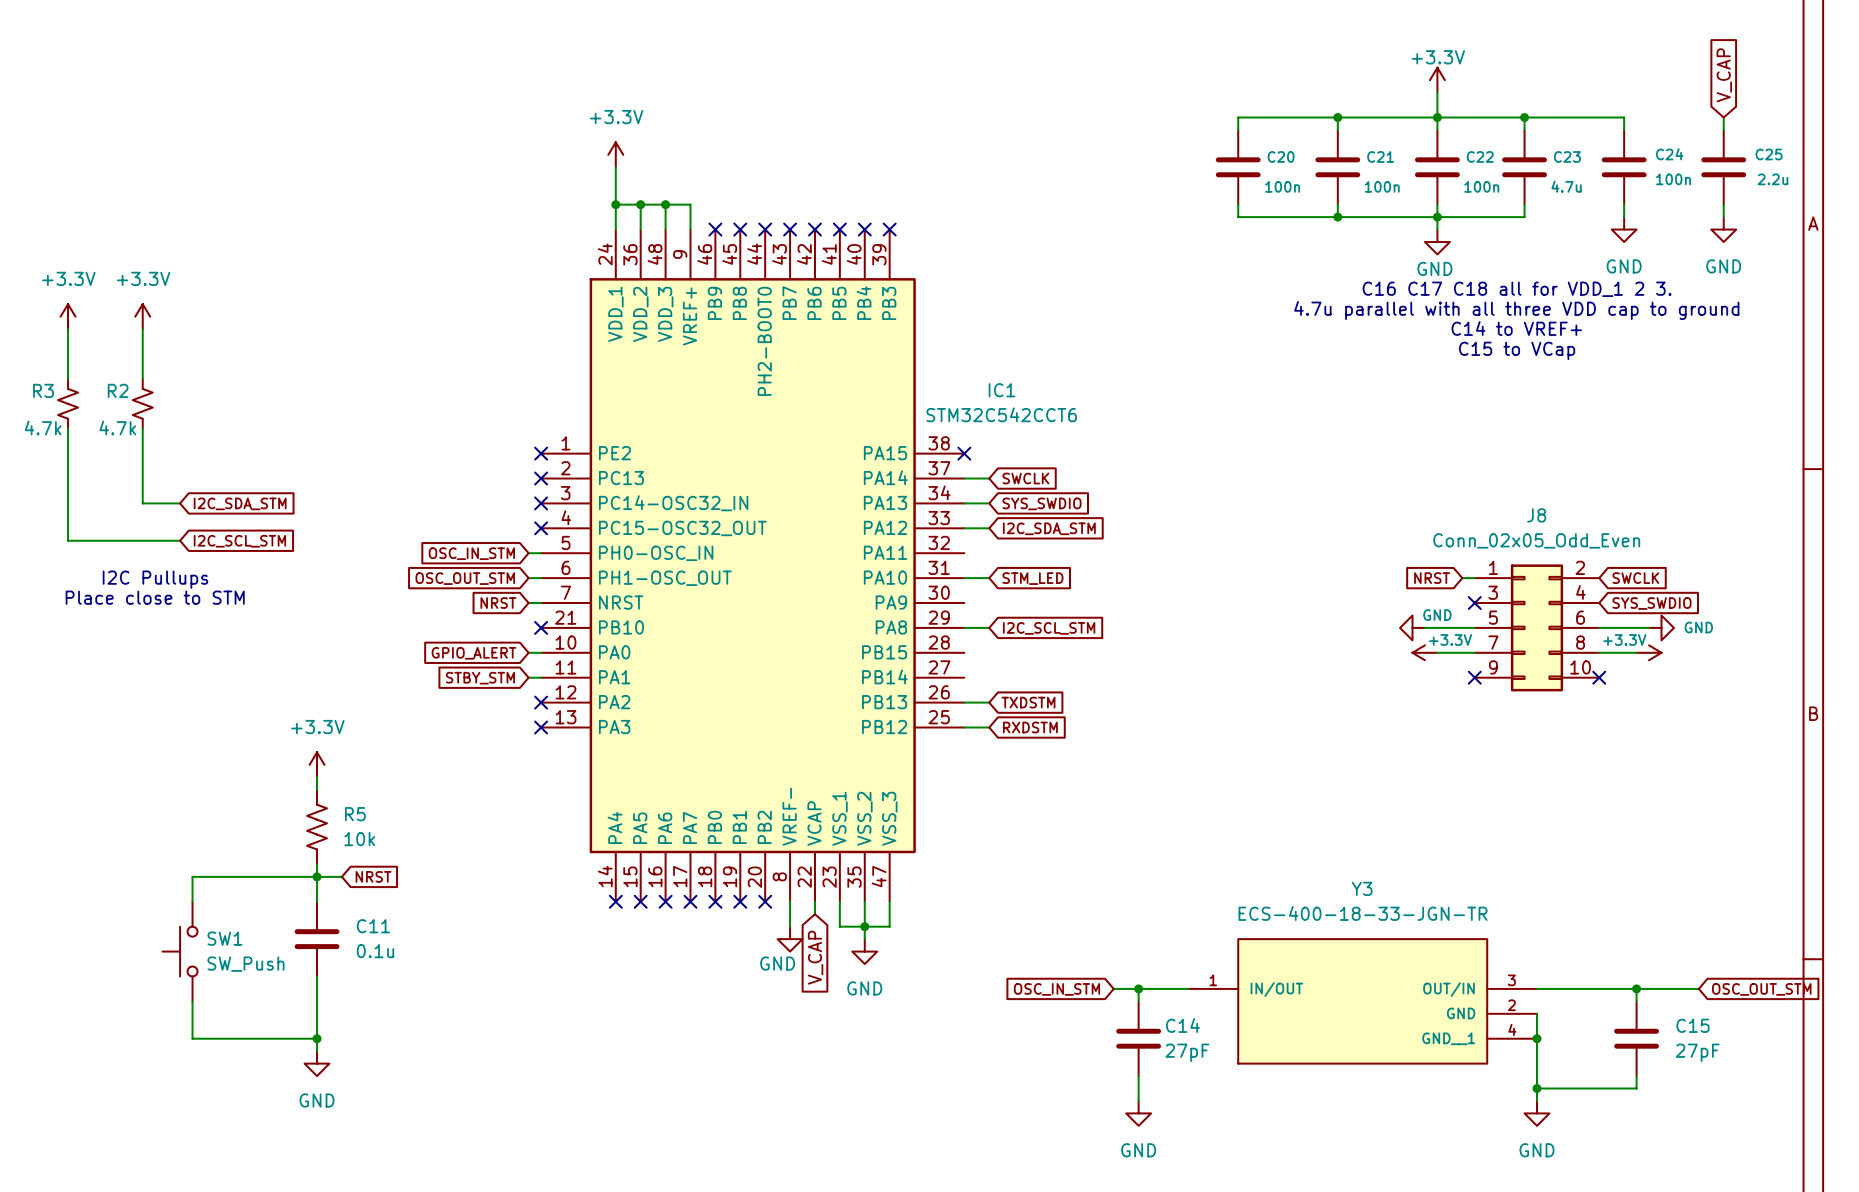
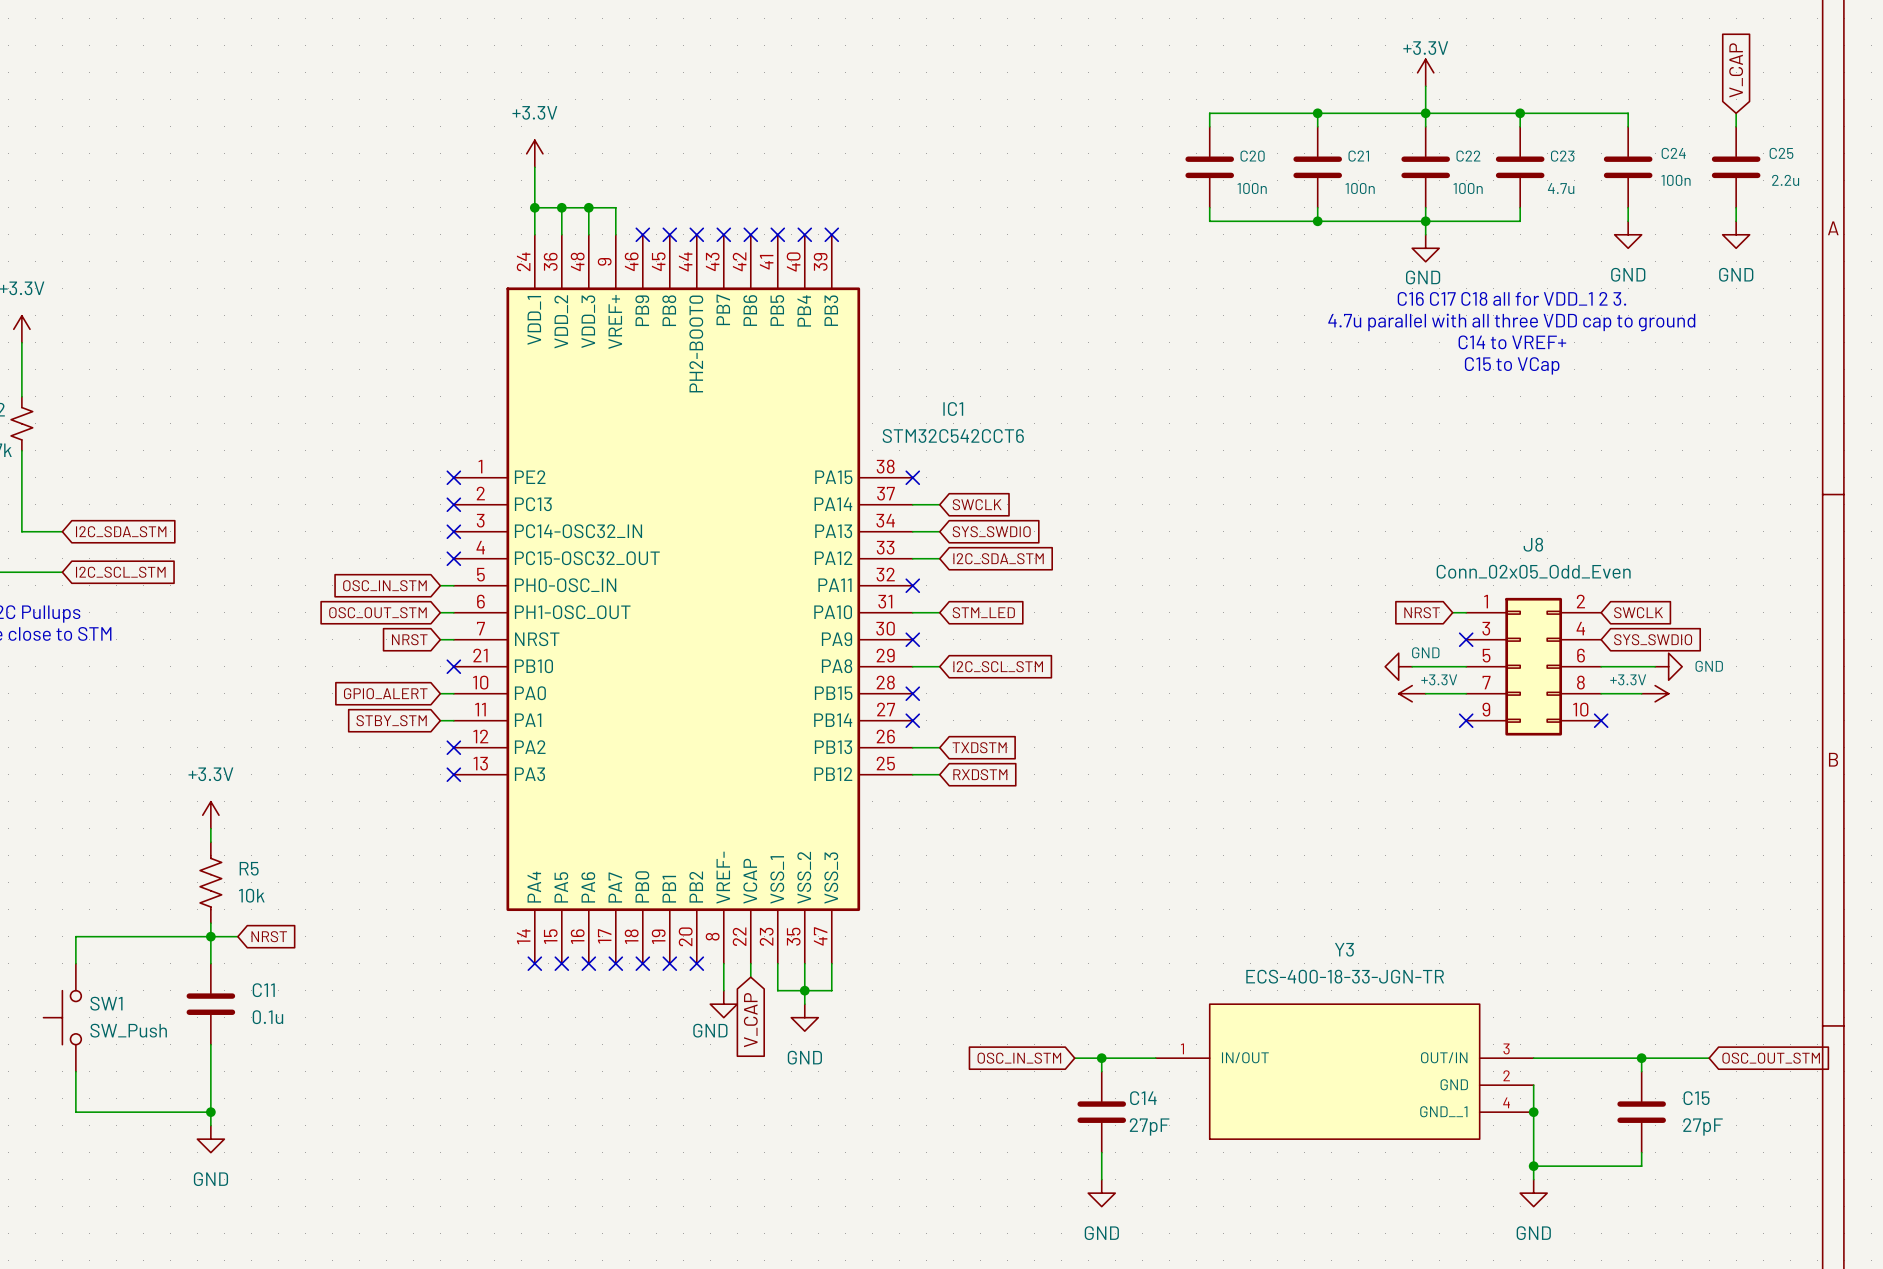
no-connect mark: none -> (912, 585)
no-connect mark: none -> (912, 639)
no-connect mark: none -> (912, 693)
no-connect mark: none -> (912, 720)

